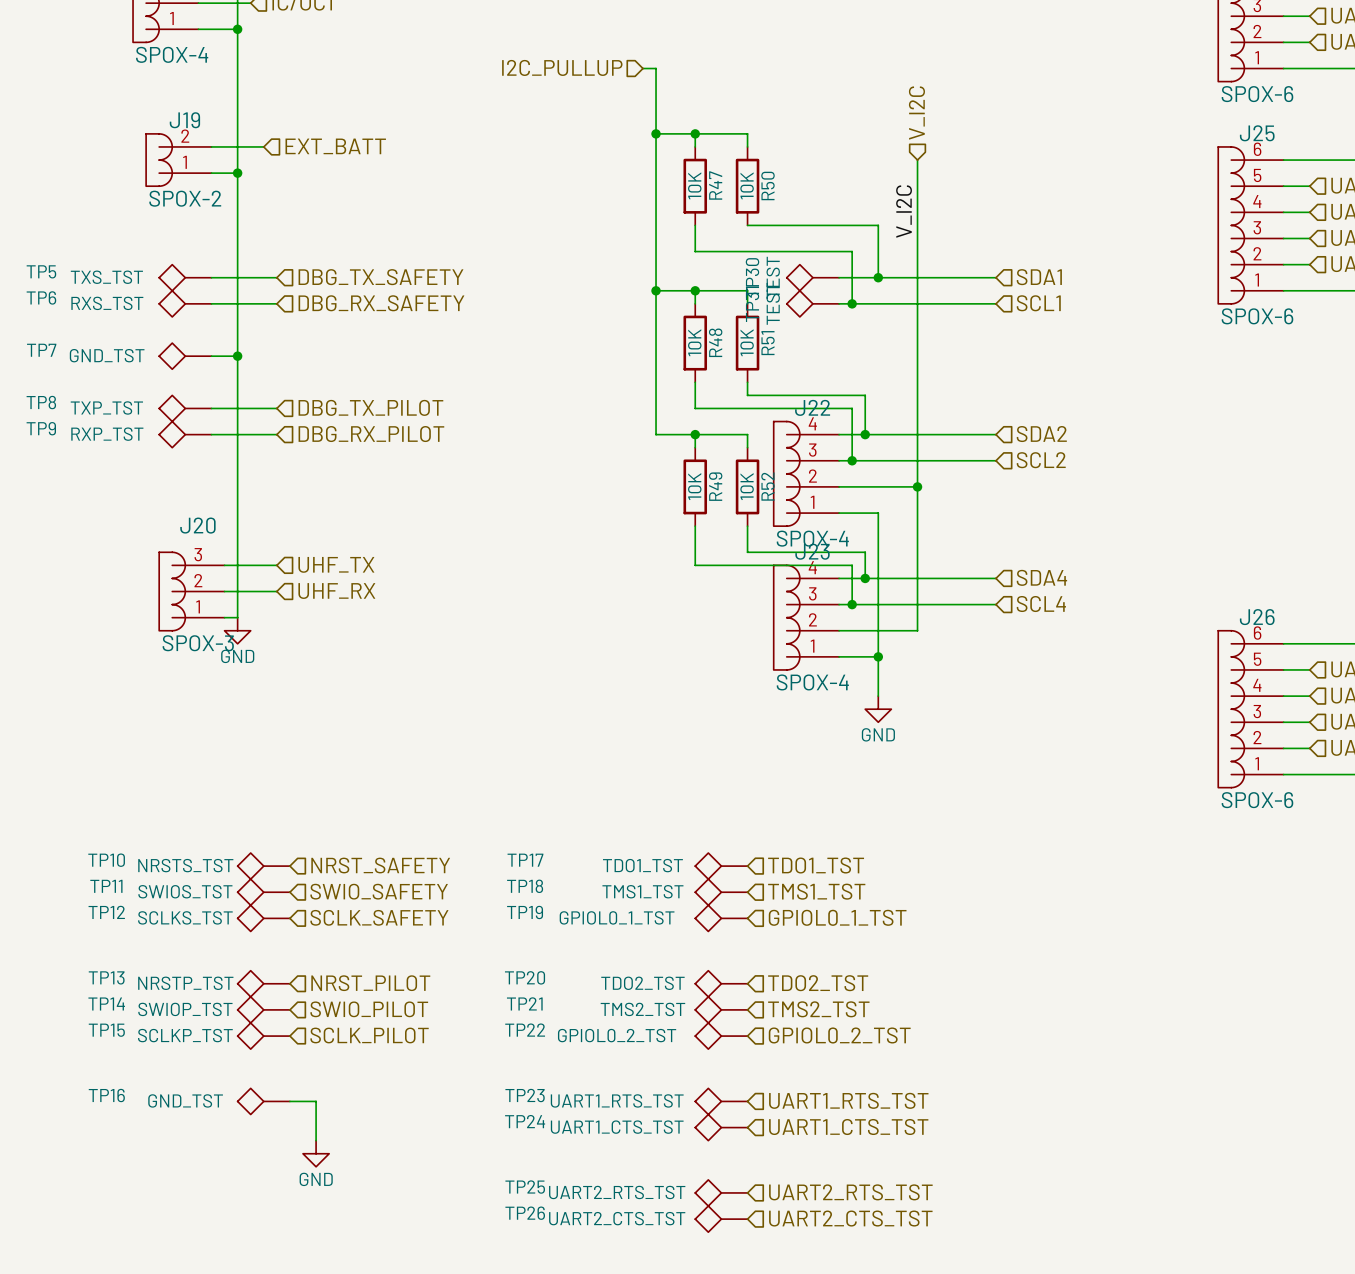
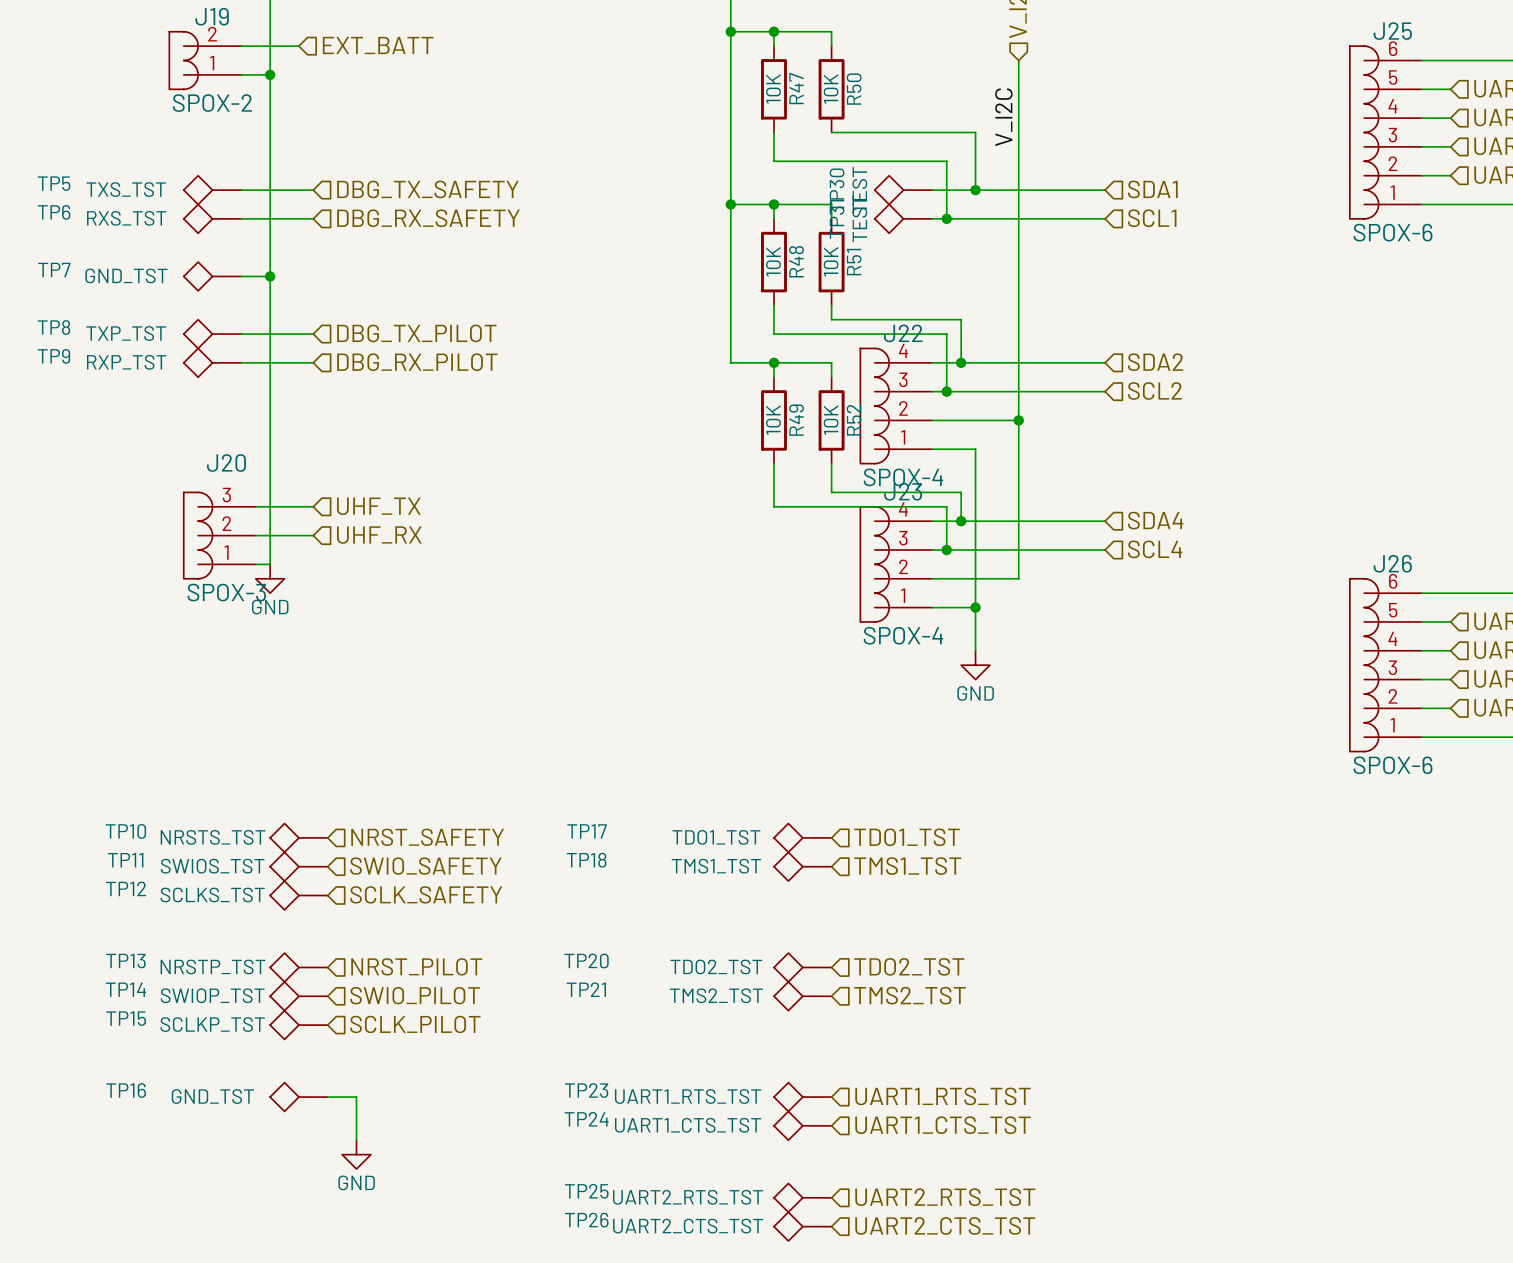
hierarchical label: GPIOL0_1_TST (837, 917) -> none
TP19: GPIOL0_1_TST (721, 918) -> none
hierarchical label: GPIOL0_2_TST (839, 1035) -> none
TP22: GPIOL0_2_TST (721, 1036) -> none

